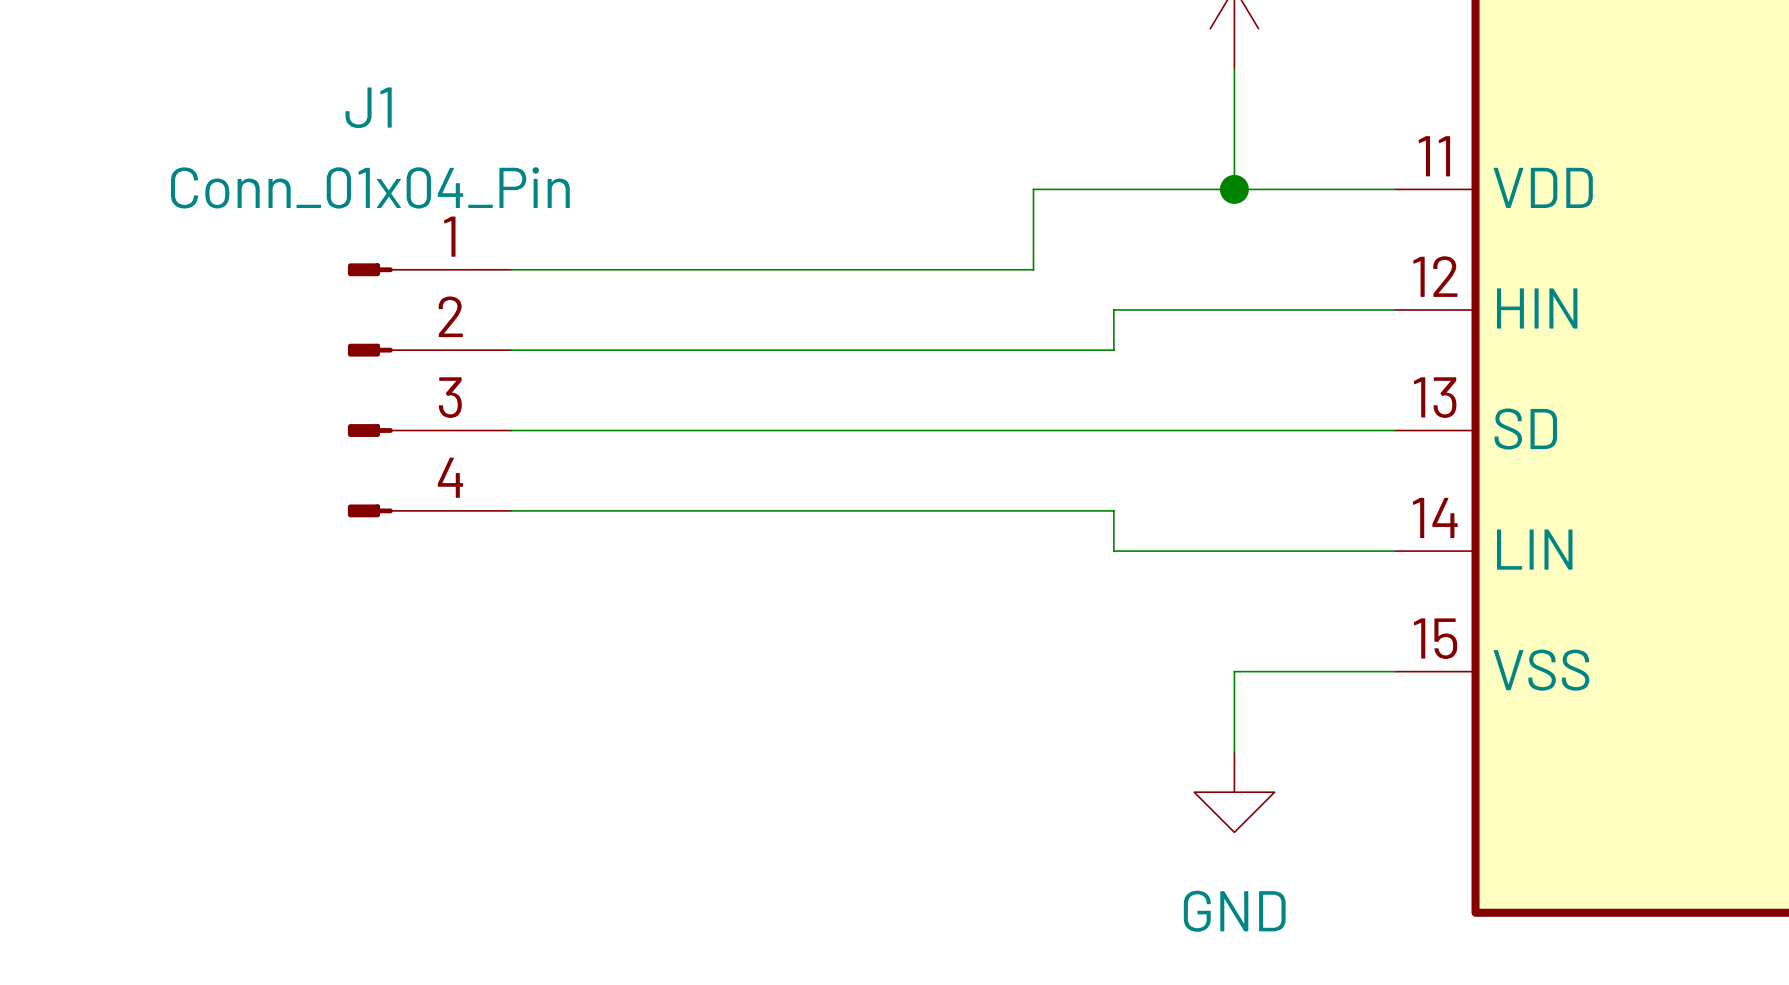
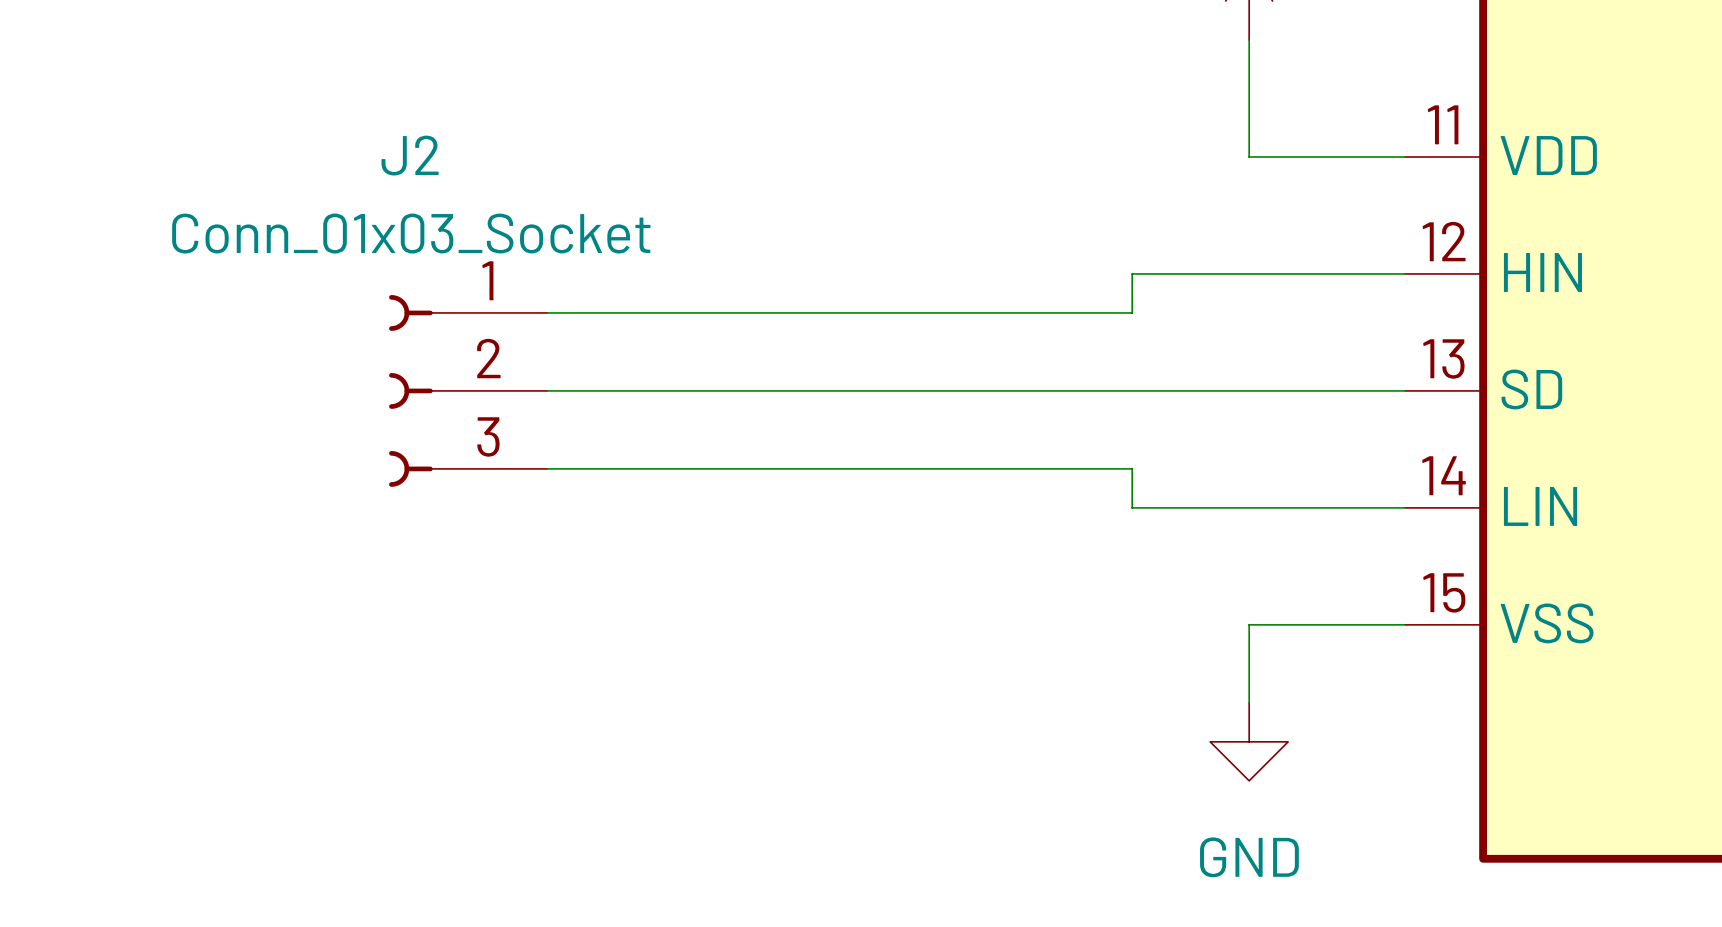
wire: (1234, 189) (1033, 189) (1033, 269) (511, 269) -> none
junction: (1234, 189) -> none
J1: Conn_01x04_Pin (429, 390) -> none
J2: none -> Conn_01x03_Socket (468, 390)

